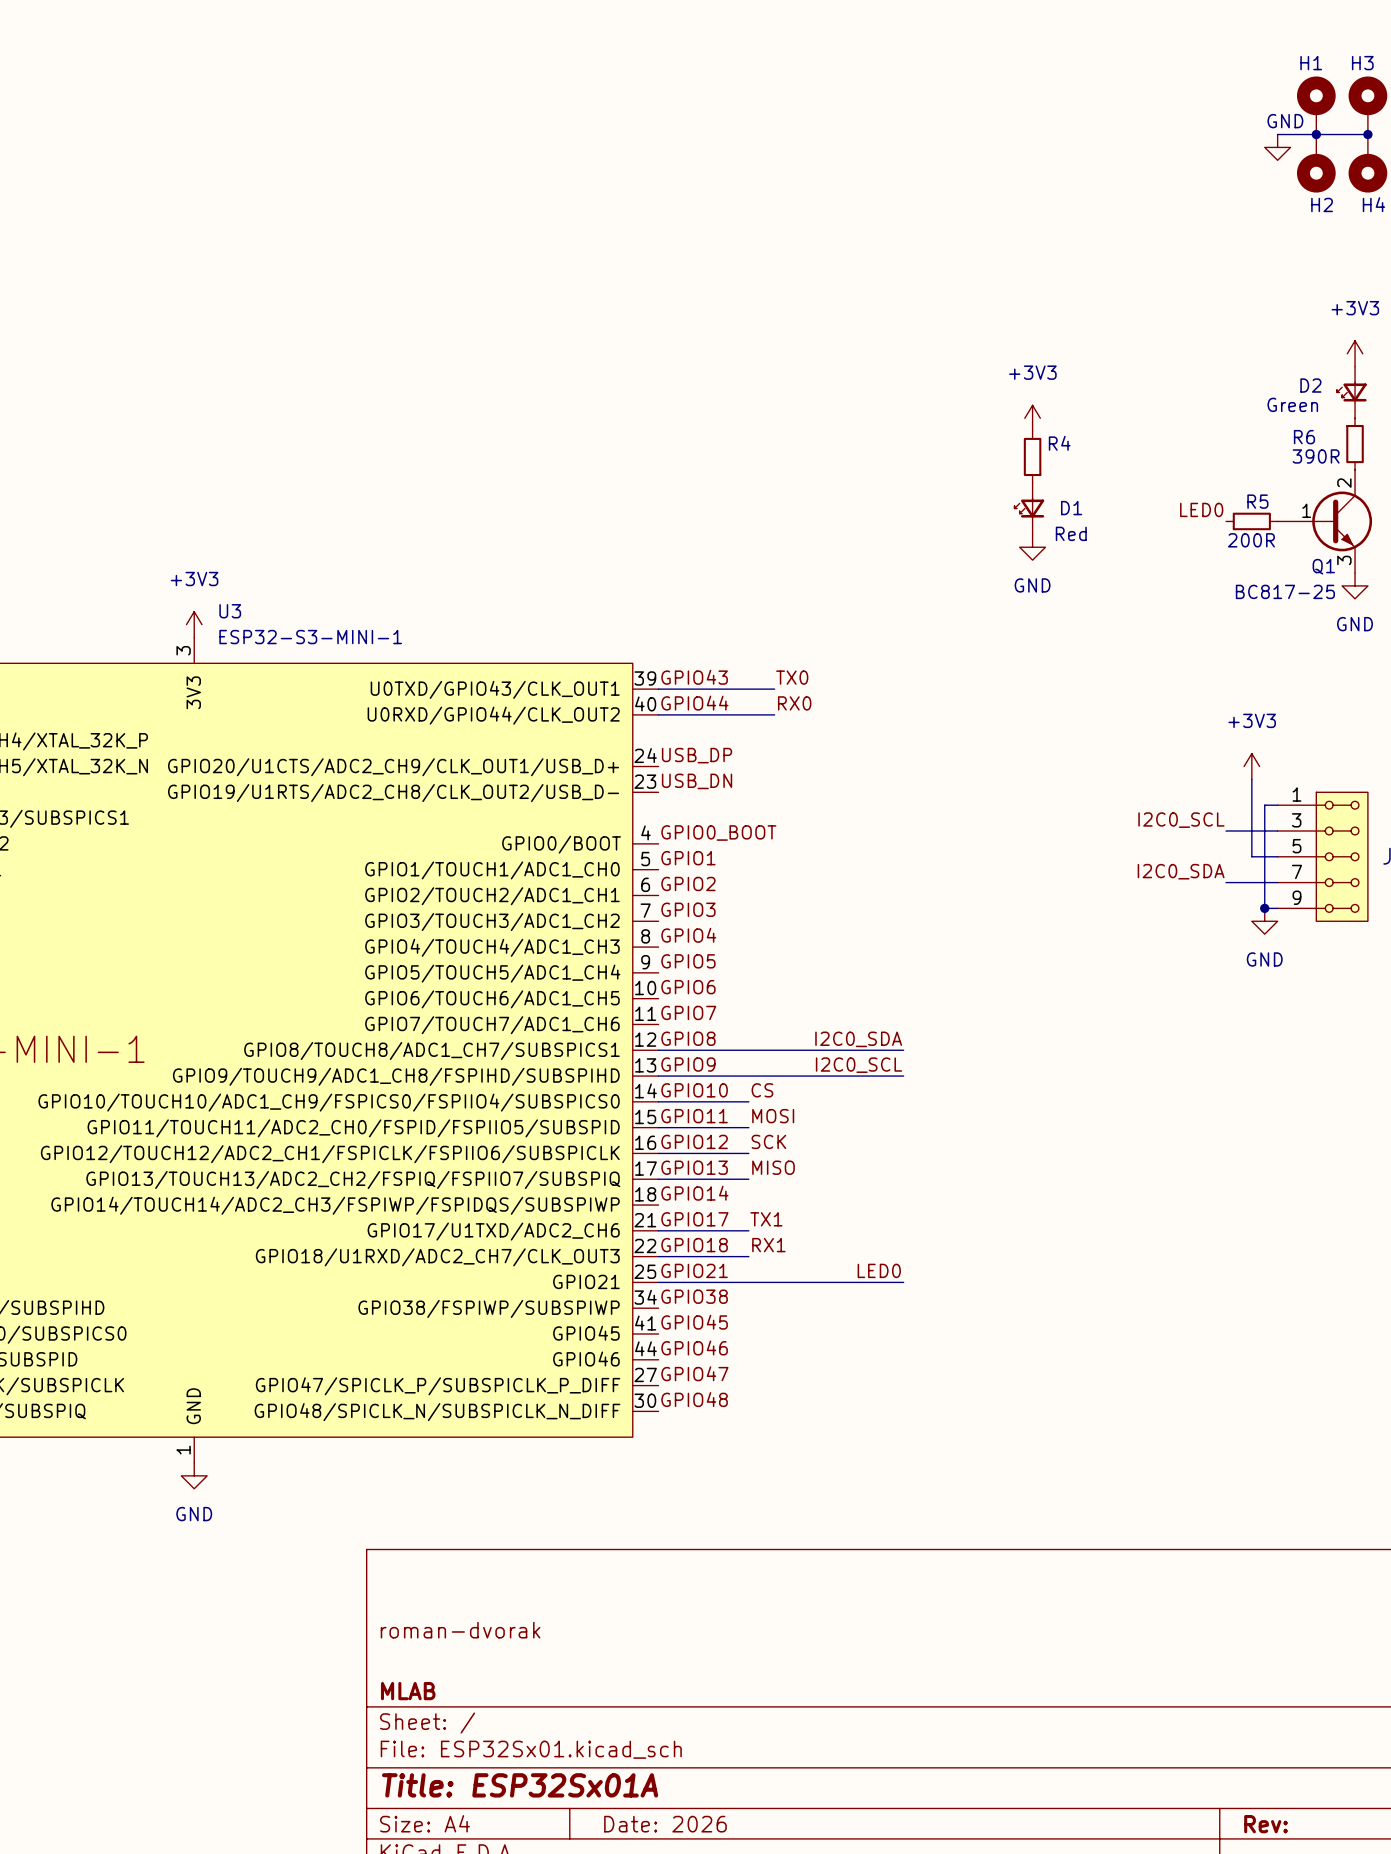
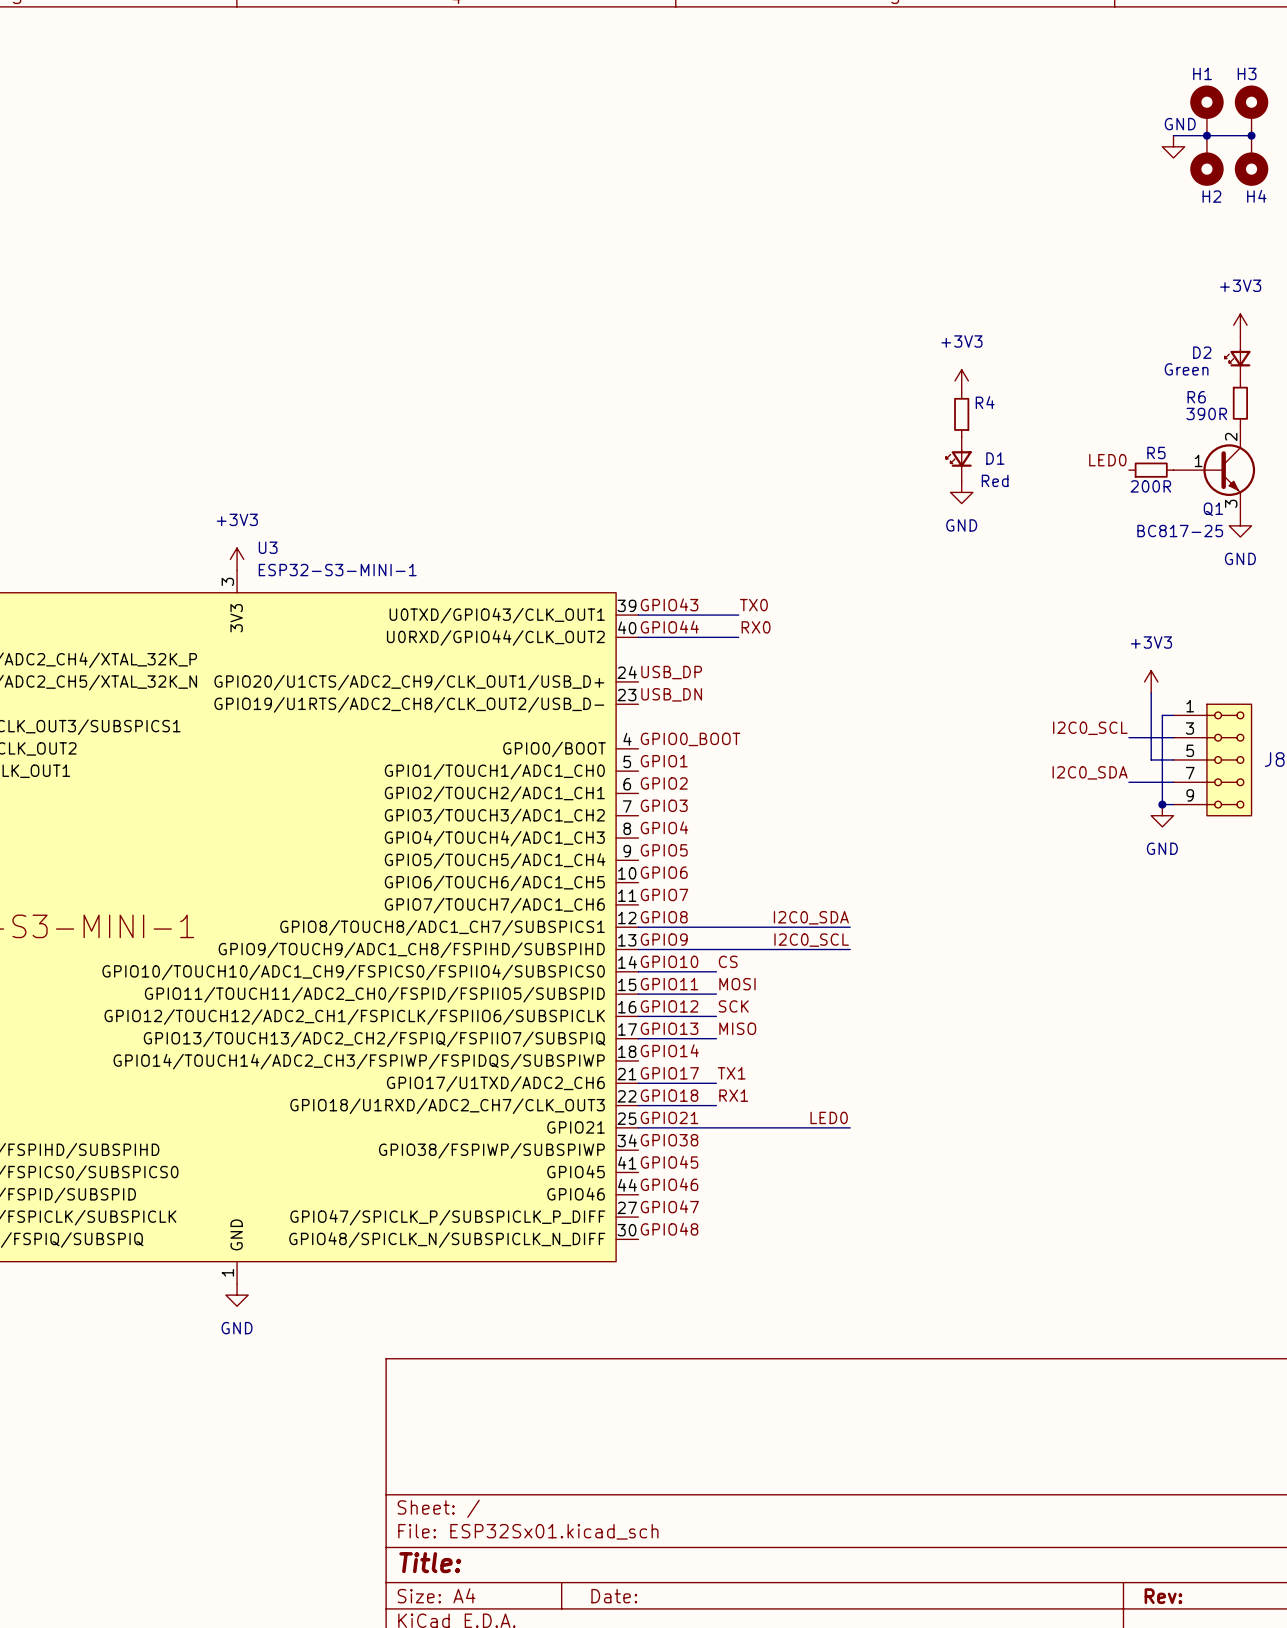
title block: roman-dvorak (460, 1630) -> none
title block: MLAB (408, 1691) -> none
title block: Title: ESP32Sx01A (520, 1785) -> Title: (430, 1562)
title block: Date: 2026 (665, 1824) -> Date: (614, 1596)

